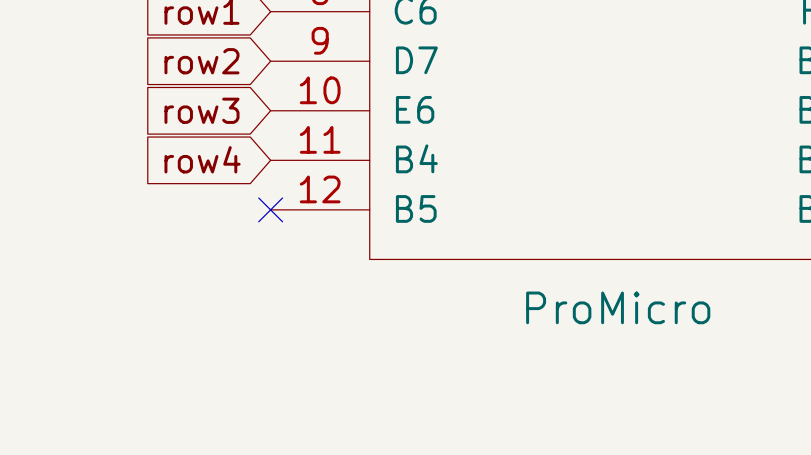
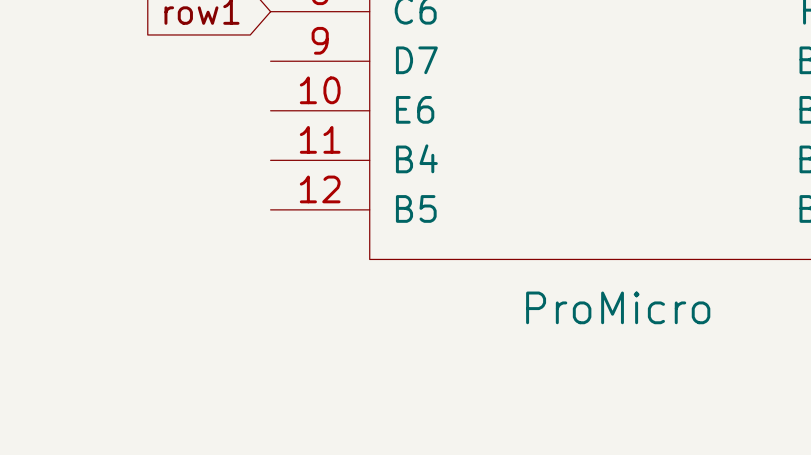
global label: row2 (201, 61) -> none
global label: row3 (201, 110) -> none
global label: row4 (202, 159) -> none
no-connect mark: (270, 209) -> none

